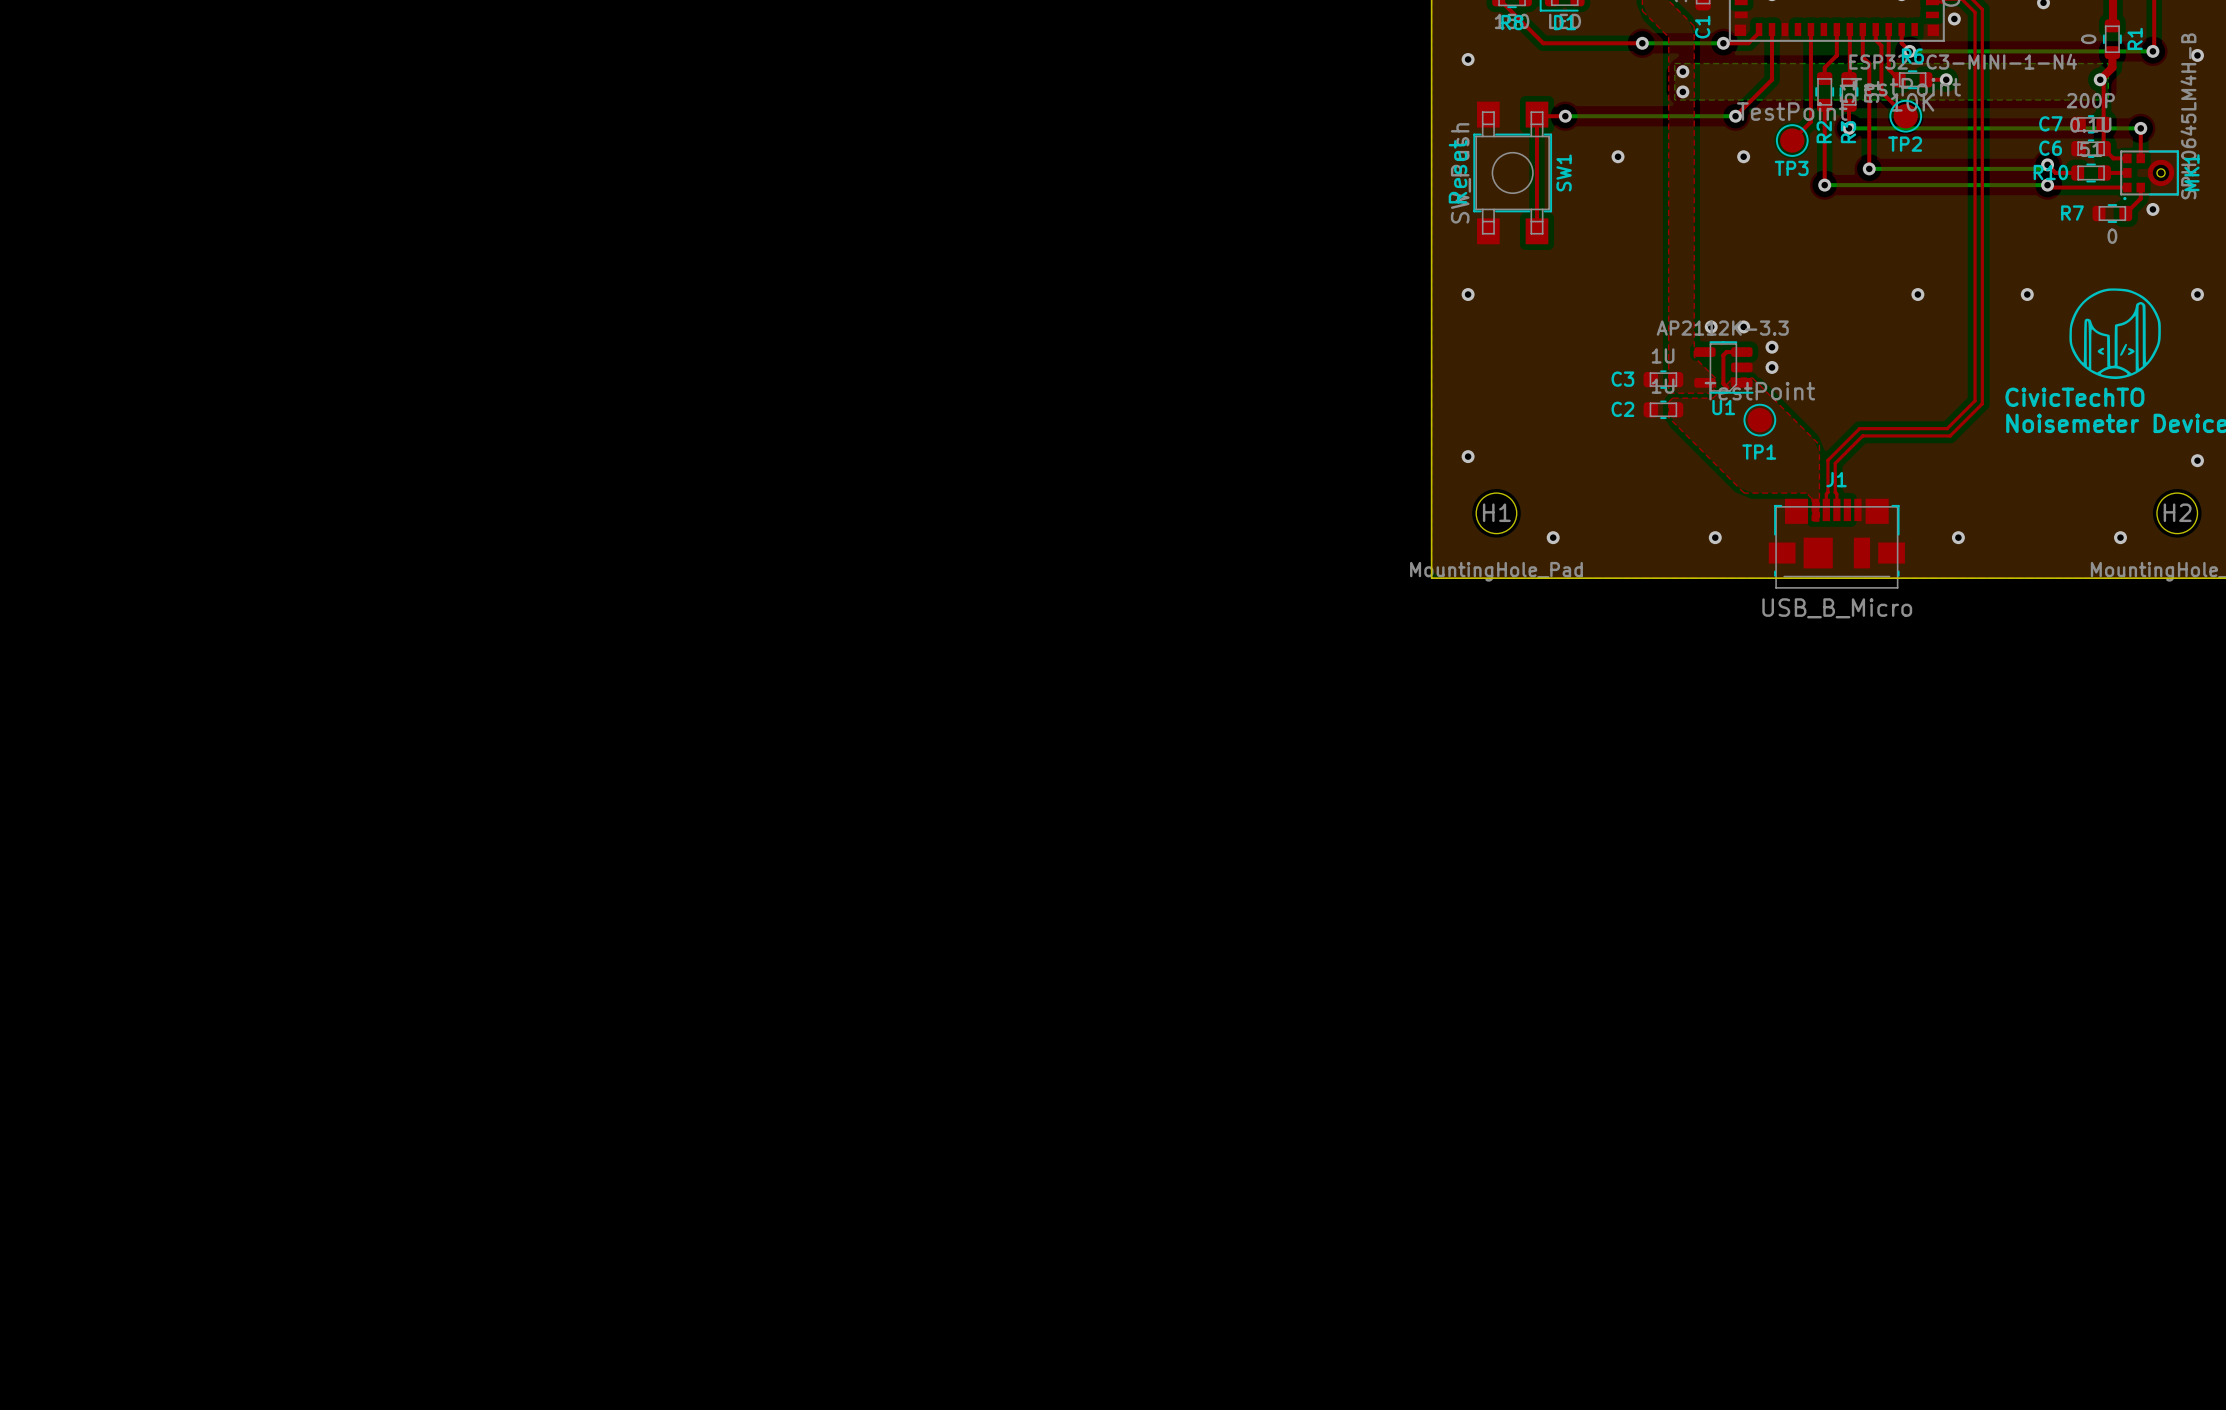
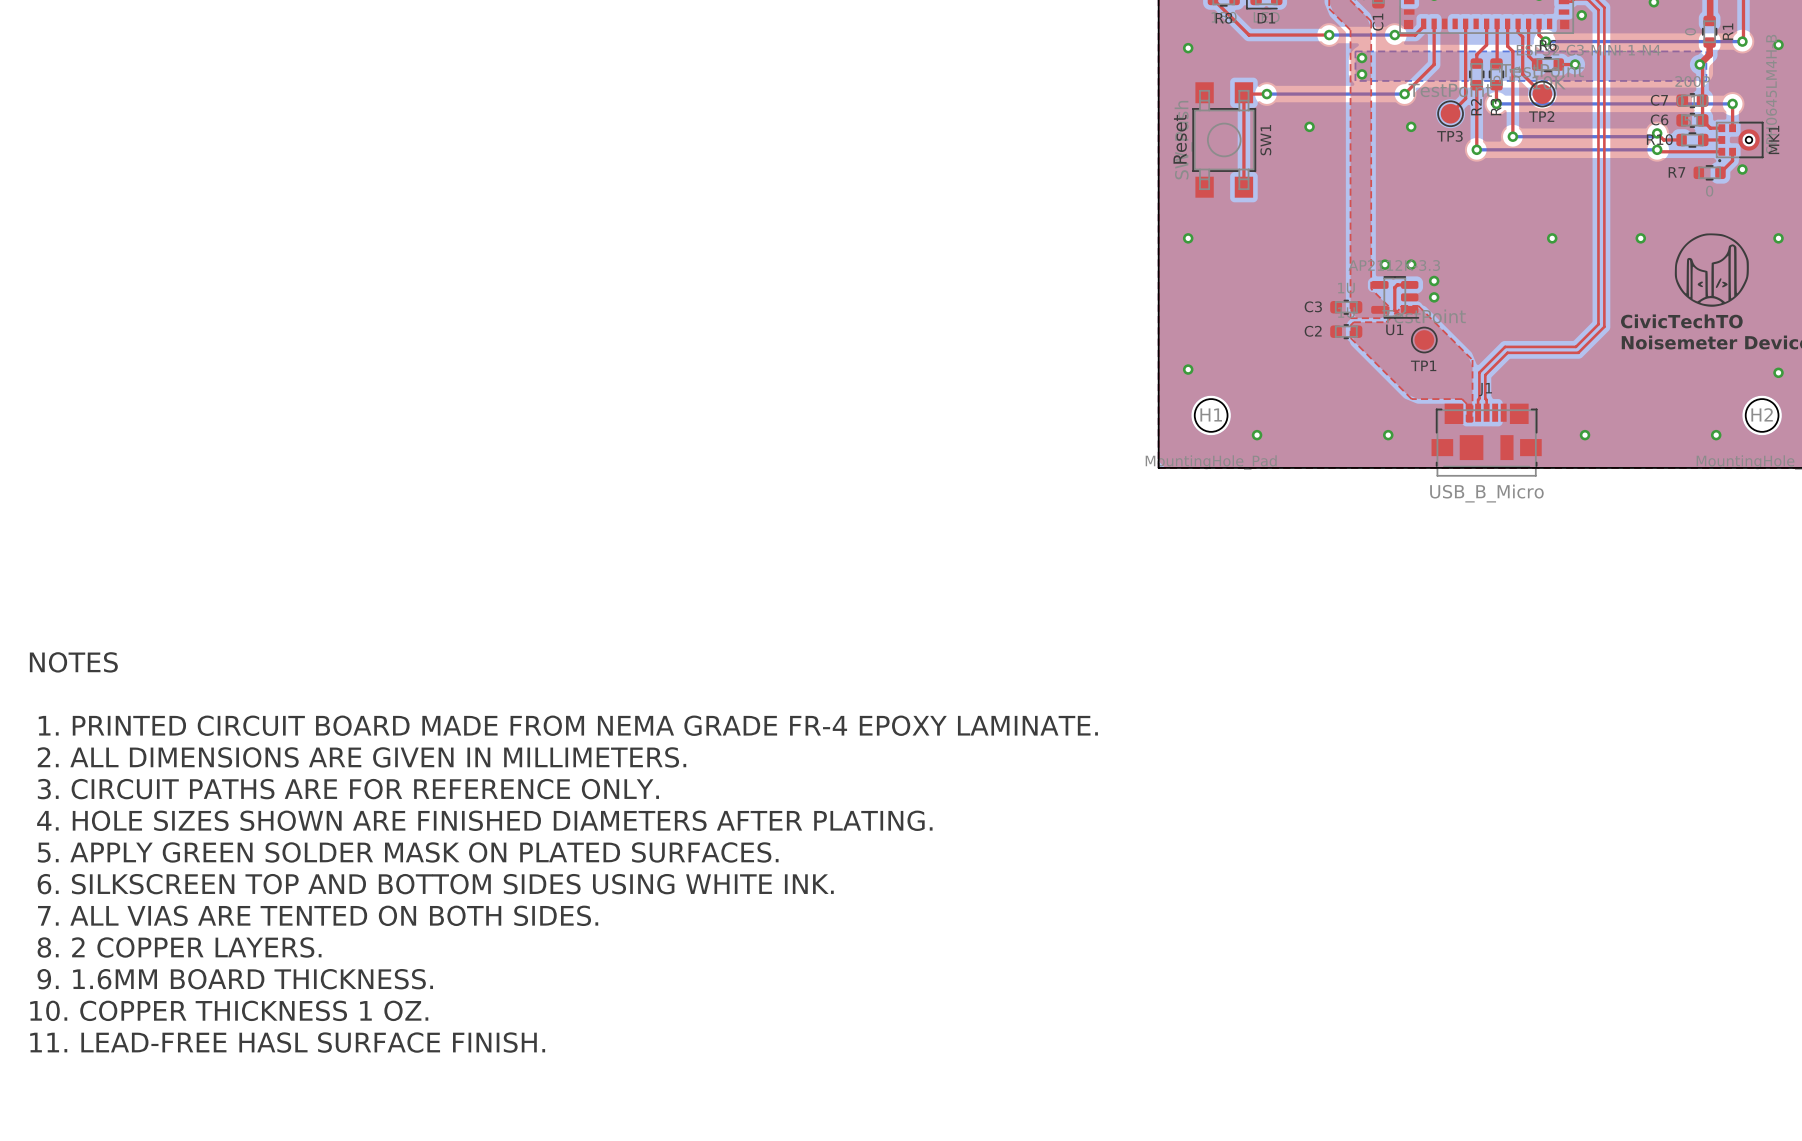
text: none -> NOTES (73, 662)
text: none -> 1. PRINTED CIRCUIT BOARD MADE FROM NEMA GRADE FR-4 EPOXY LAMINATE. (568, 725)
text: none -> 2. ALL DIMENSIONS ARE GIVEN IN MILLIMETERS. (361, 757)
text: none -> 3. CIRCUIT PATHS ARE FOR REFERENCE ONLY. (348, 789)
text: none -> 4. HOLE SIZES SHOWN ARE FINISHED DIAMETERS AFTER PLATING. (484, 820)
text: none -> 5. APPLY GREEN SOLDER MASK ON PLATED SURFACES. (408, 852)
text: none -> 6. SILKSCREEN TOP AND BOTTOM SIDES USING WHITE INK. (435, 884)
text: none -> 7. ALL VIAS ARE TENTED ON BOTH SIDES. (318, 915)
text: none -> 8. 2 COPPER LAYERS. (179, 947)
text: none -> 9. 1.6MM BOARD THICKNESS. (235, 979)
text: none -> 10. COPPER THICKNESS 1 OZ. (229, 1010)
text: none -> 11. LEAD-FREE HASL SURFACE FINISH. (287, 1042)

